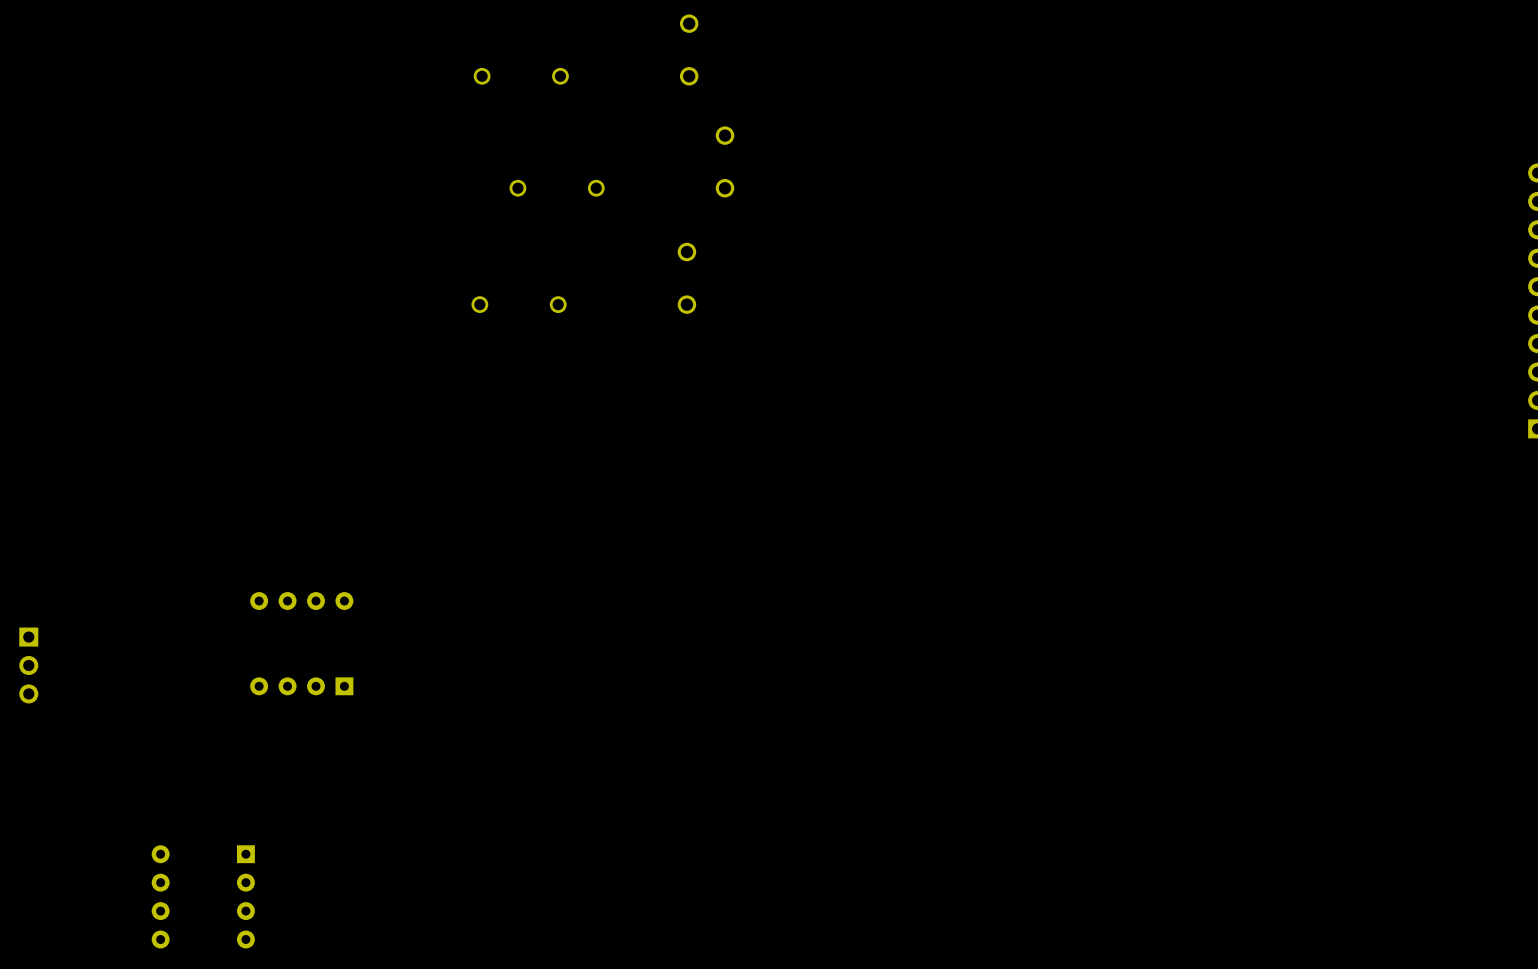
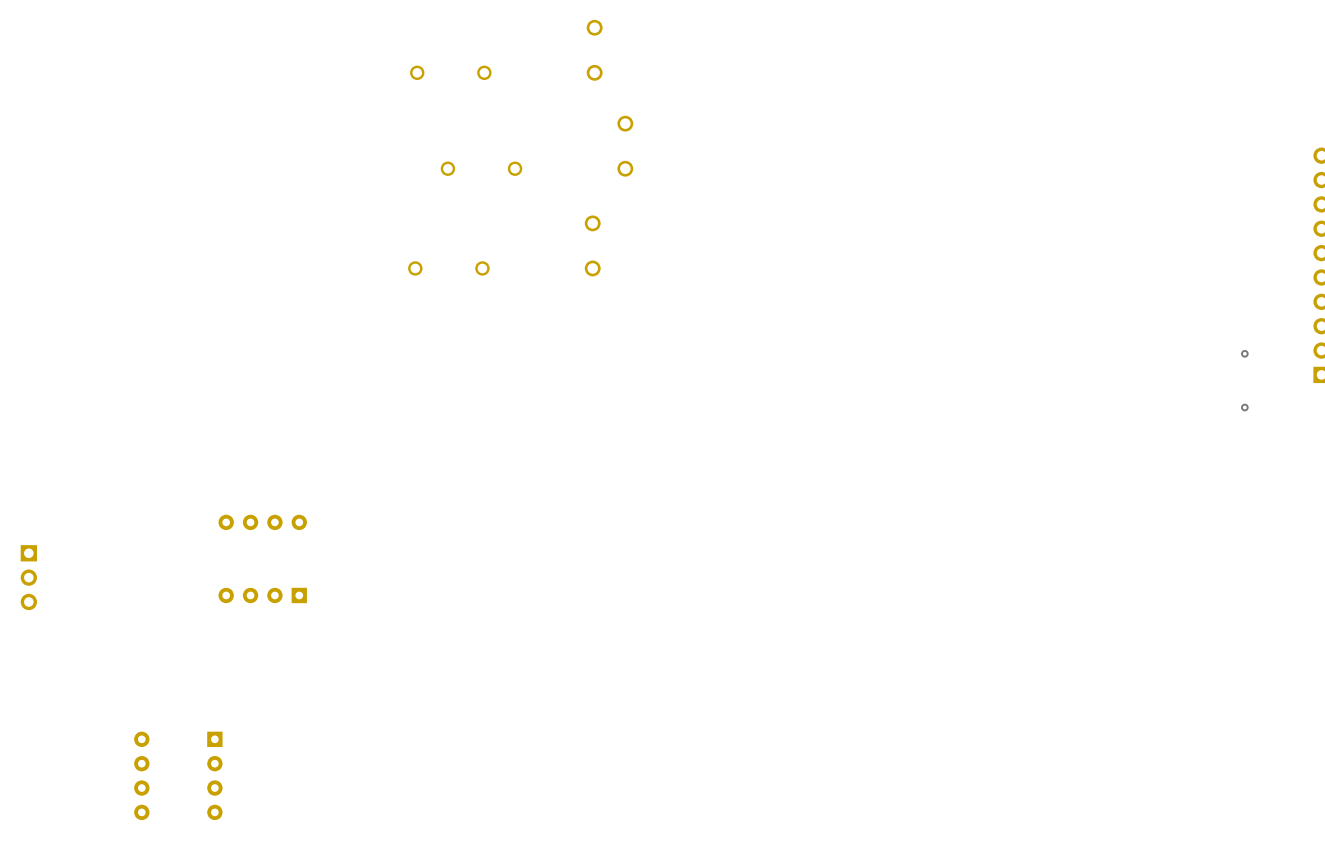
via: none -> (1244, 353)
via: none -> (1244, 407)

